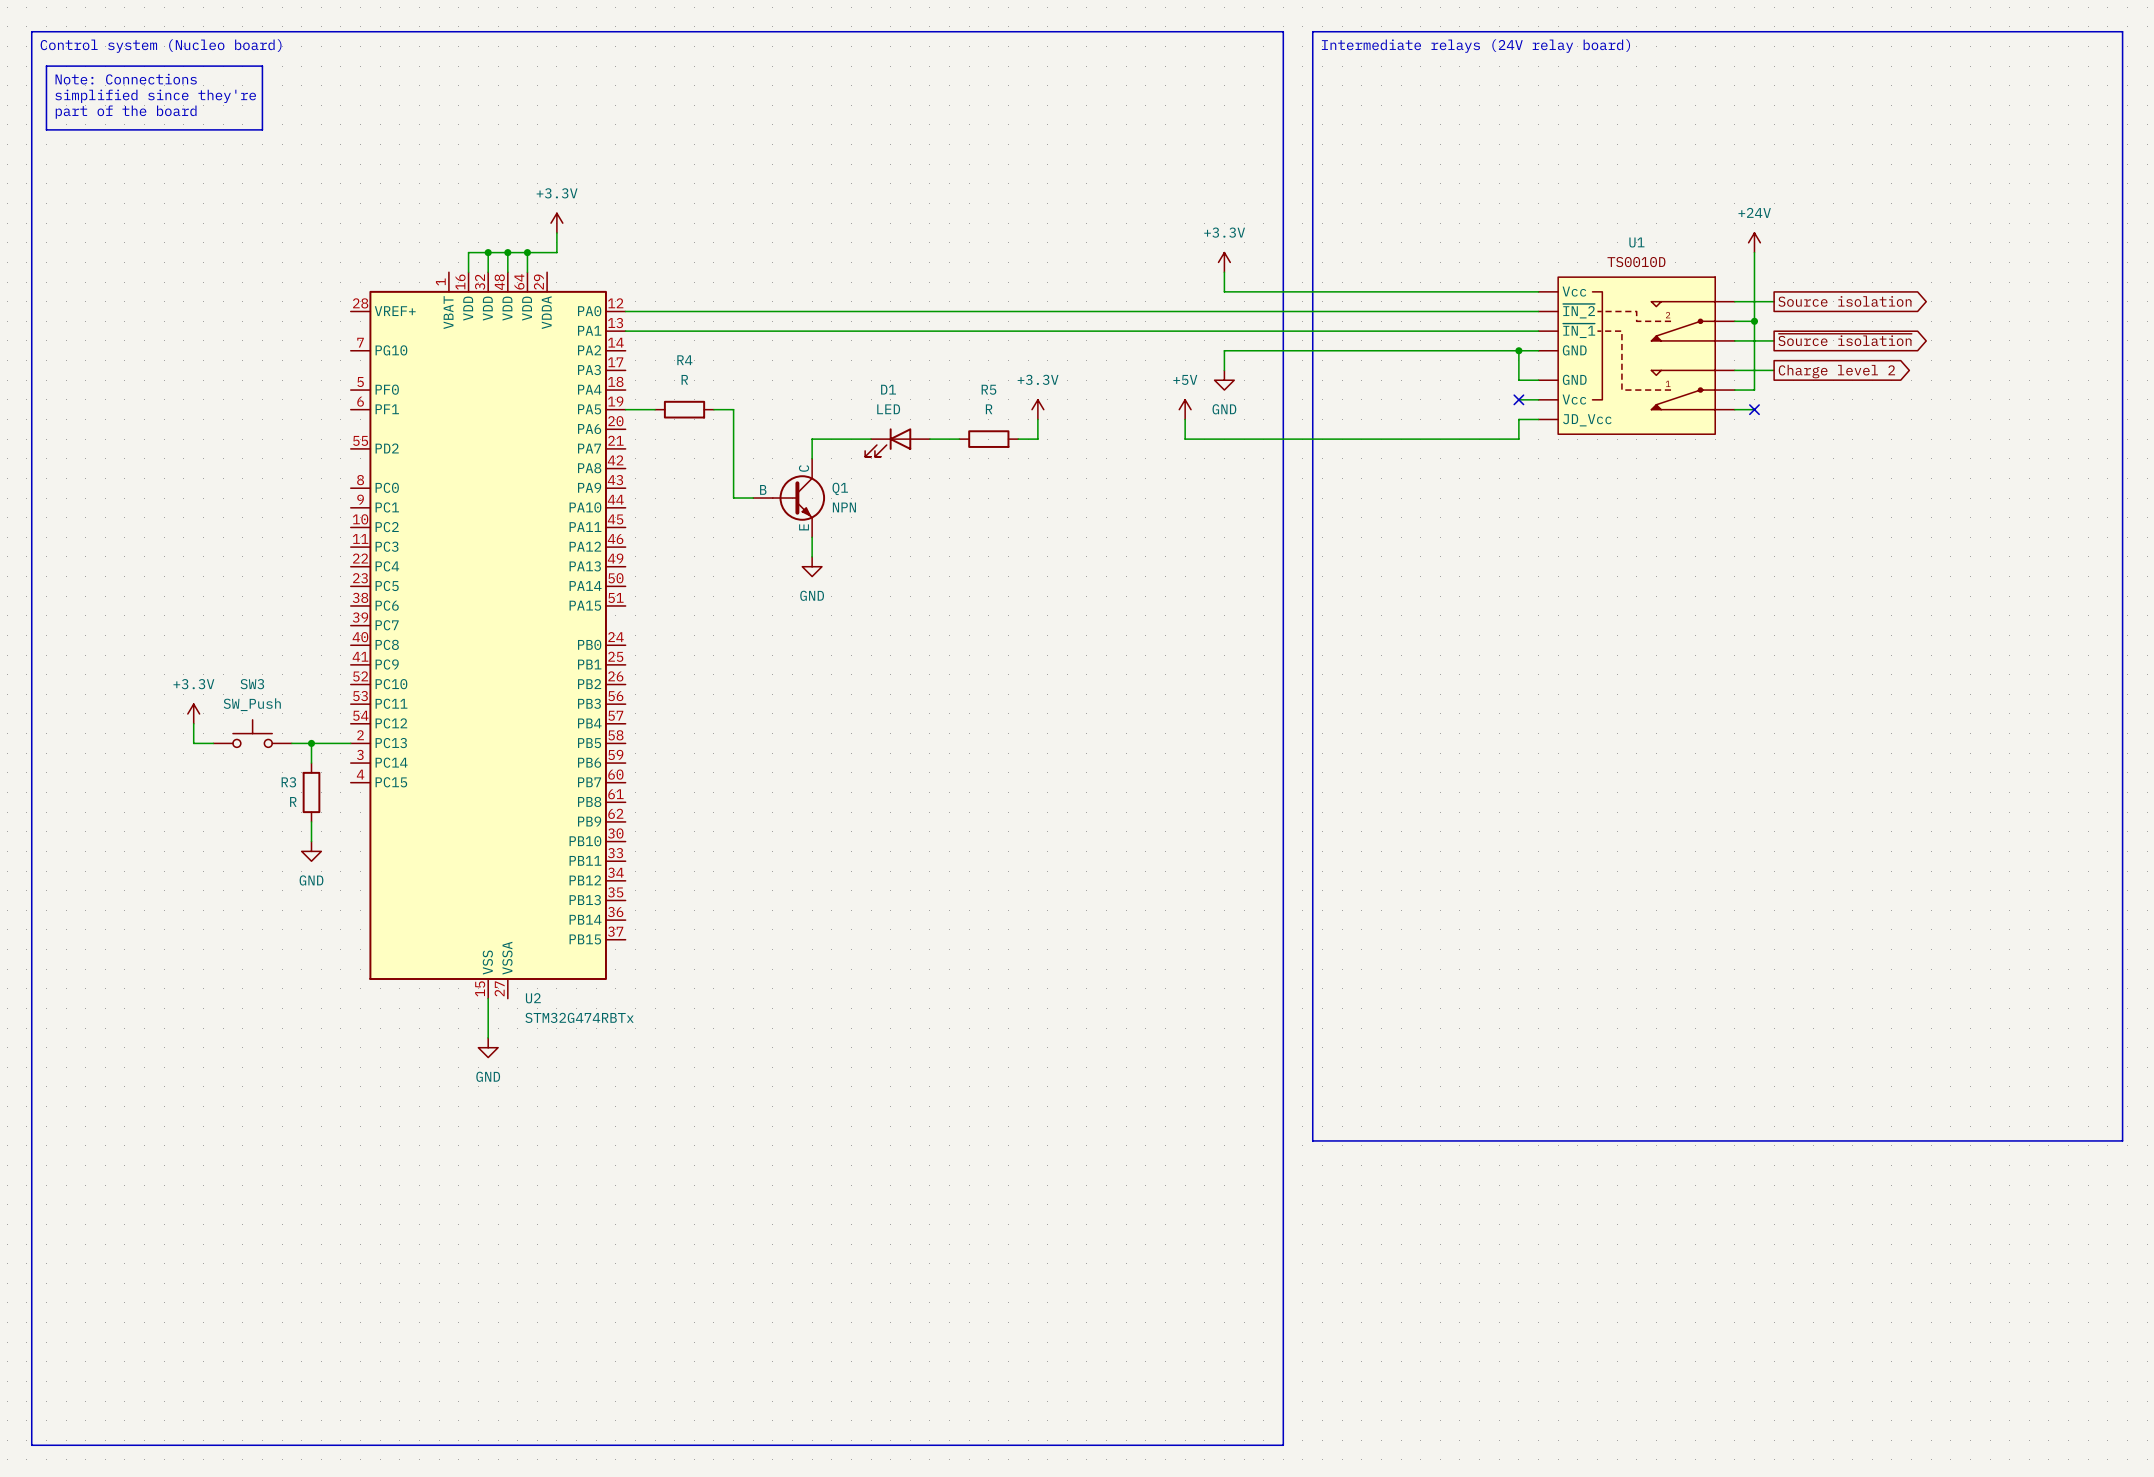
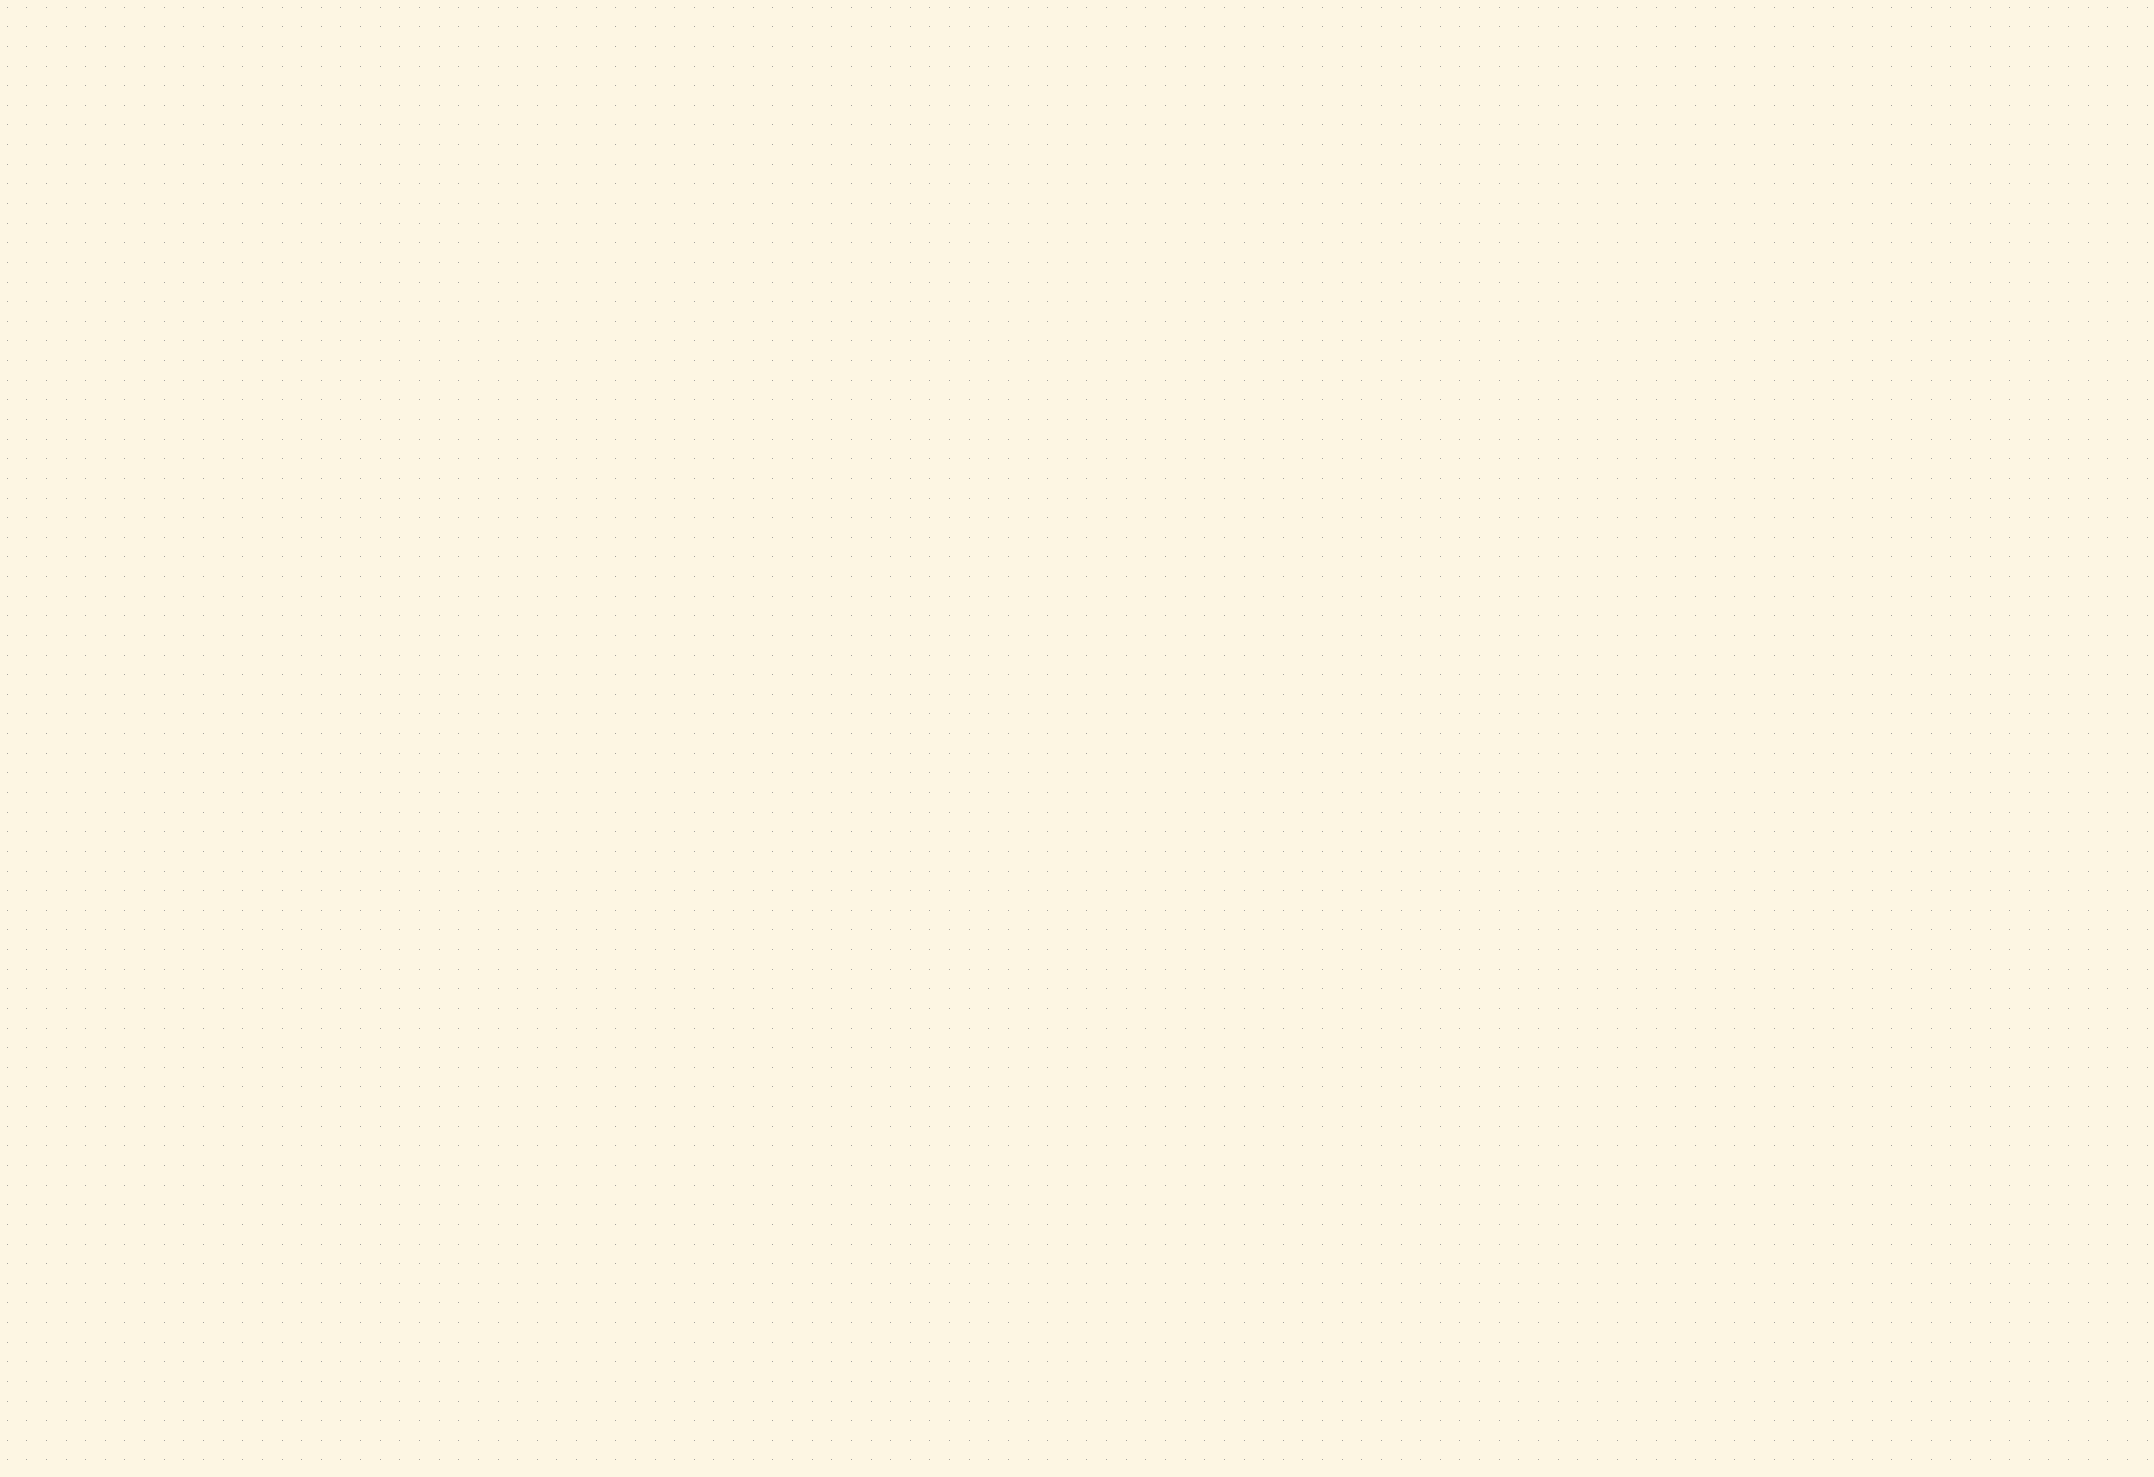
line: (31, 31) (1283, 31) (1283, 1445) (31, 1445) (31, 31) -> none
line: (1312, 31) (2122, 31) (2122, 1140) (1312, 1140) (1312, 31) -> none
text: Control system (Nucleo board) (161, 46) -> none
text: Intermediate relays (24V relay board) (1475, 46) -> none
line: (46, 66) (262, 66) (262, 129) (46, 129) (46, 66) -> none
text: Note: Connections (126, 79) -> none
text: simplified since they're (155, 96) -> none
text: part of the board (126, 112) -> none
power symbol: +3.3V (556, 223) -> none
wire: (556, 232) (556, 252) (468, 252) (468, 272) -> none
power symbol: +24V (1754, 242) -> none
wire: (488, 252) (488, 272) -> none
junction: (488, 252) -> none
wire: (507, 252) (507, 272) -> none
junction: (507, 252) -> none
wire: (527, 252) (527, 272) -> none
junction: (527, 252) -> none
wire: (1754, 252) (1754, 390) (1734, 390) -> none
power symbol: +3.3V (1224, 262) -> none
wire: (1224, 272) (1224, 291) (1538, 291) -> none
wire: (1734, 301) (1774, 301) -> none
global label: Source isolation (1844, 301) -> none
wire: (625, 311) (1538, 311) -> none
wire: (1734, 321) (1754, 321) -> none
junction: (1754, 321) -> none
wire: (625, 331) (1538, 331) -> none
global label: ~{Source isolation} (1845, 339) -> none
wire: (1734, 340) (1774, 340) -> none
wire: (1518, 350) (1518, 380) (1538, 380) -> none
junction: (1518, 350) -> none
wire: (1538, 350) (1224, 350) (1224, 370) -> none
U1: (1636, 355) -> none
wire: (1734, 370) (1774, 370) -> none
global label: Charge level 2 (1836, 371) -> none
power symbol: GND (1224, 380) -> none
wire: (1518, 399) (1538, 399) -> none
no-connect mark: (1518, 399) -> none
wire: (625, 409) (655, 409) -> none
R4: R (684, 409) -> none
wire: (713, 409) (733, 409) (733, 498) (753, 498) -> none
power symbol: +3.3V (1037, 409) -> none
power symbol: +5V (1185, 409) -> none
wire: (1734, 409) (1754, 409) -> none
no-connect mark: (1754, 409) -> none
wire: (1037, 419) (1037, 439) (1018, 439) -> none
wire: (1185, 419) (1185, 439) (1518, 439) (1518, 419) (1538, 419) -> none
wire: (871, 439) (812, 439) (812, 458) -> none
wire: (929, 439) (959, 439) -> none
R5: R (988, 439) -> none
D1: LED (897, 442) -> none
Q1: NPN (789, 498) -> none
wire: (812, 537) (812, 556) -> none
power symbol: GND (812, 566) -> none
U2: STM32G474RBTx (488, 635) -> none
power symbol: +3.3V (193, 713) -> none
wire: (193, 723) (193, 743) (213, 743) -> none
SW3: SW_Push (252, 733) -> none
wire: (291, 743) (350, 743) -> none
wire: (311, 743) (311, 763) -> none
junction: (311, 743) -> none
R3: R (311, 792) -> none
wire: (311, 821) (311, 841) -> none
power symbol: GND (311, 851) -> none
wire: (488, 998) (488, 1037) -> none
power symbol: GND (488, 1047) -> none

